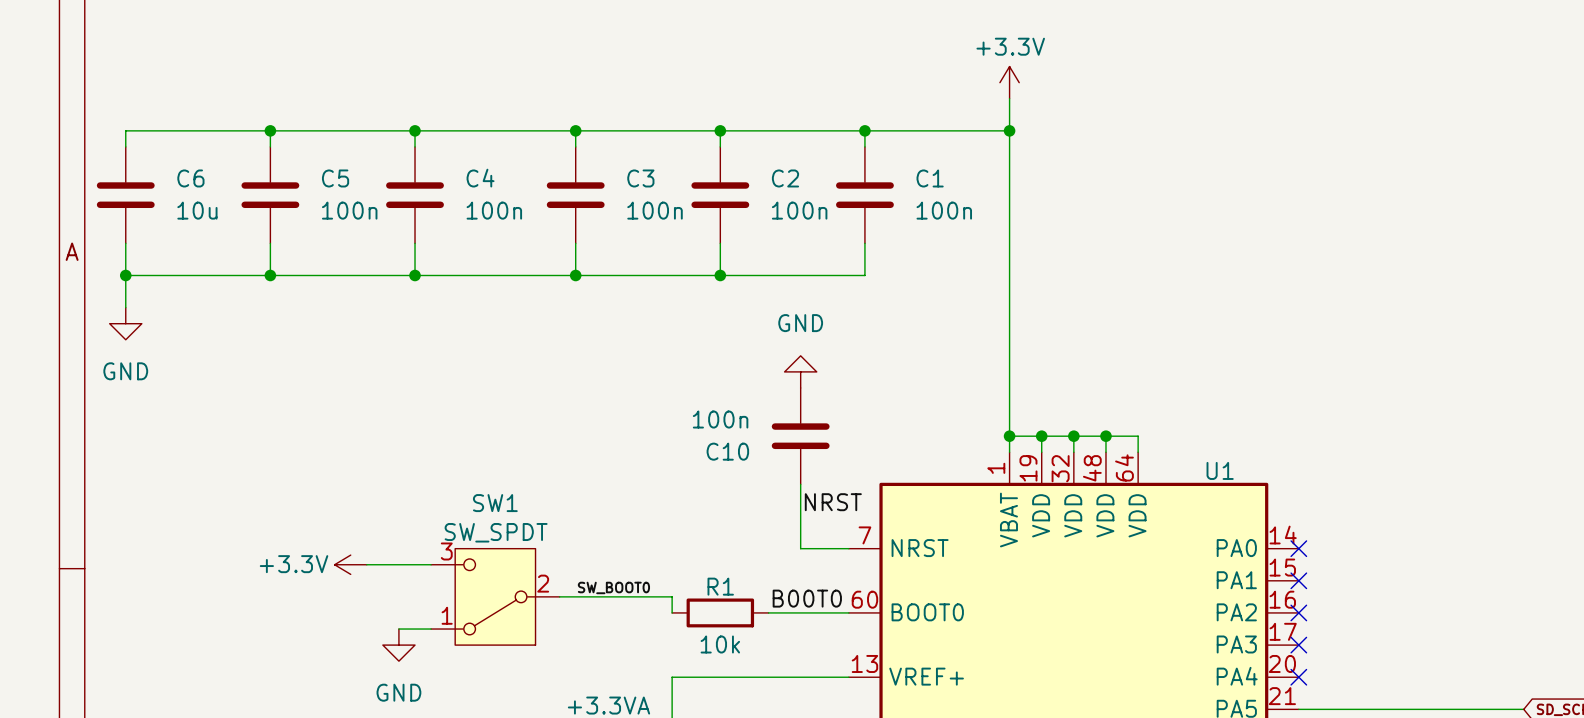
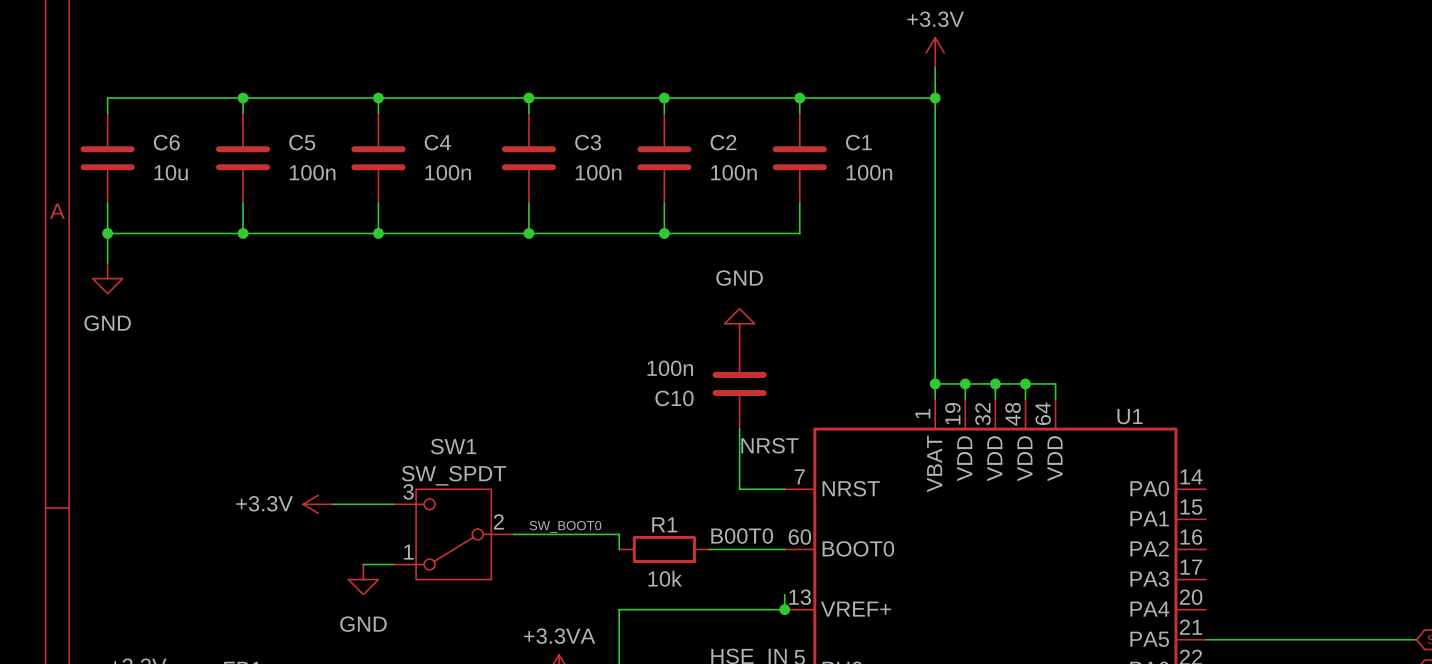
no-connect mark: (1298, 548) -> none
no-connect mark: (1298, 580) -> none
no-connect mark: (1298, 612) -> none
no-connect mark: (1298, 645) -> none
wire: none -> (784, 594) (784, 609)
junction: none -> (784, 609)
no-connect mark: (1298, 677) -> none

